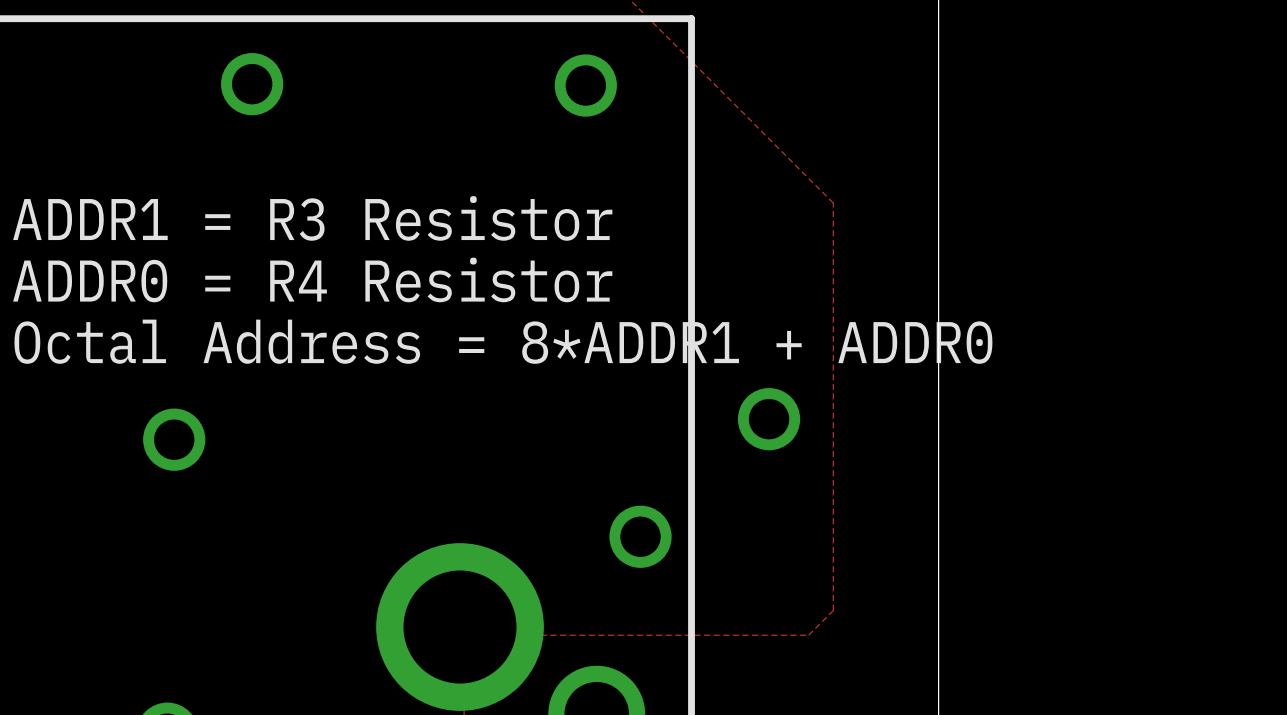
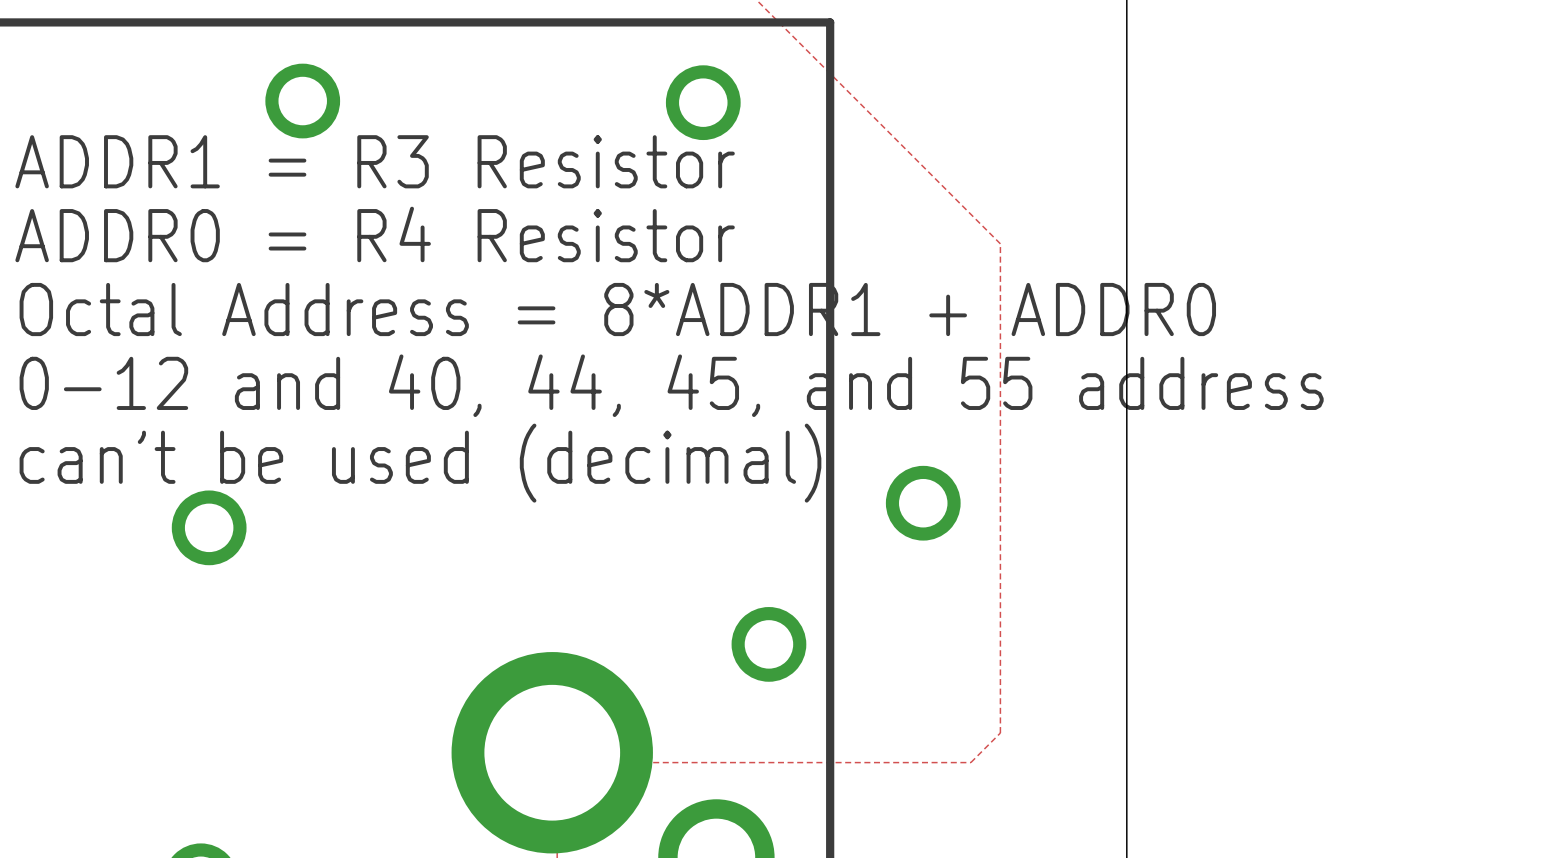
text position: ADDR1 = R3 Resistor (312, 218) -> ADDR1 = R3 Resistor (375, 161)
text position: ADDR0 = R4 Resistor (312, 279) -> ADDR0 = R4 Resistor (375, 234)
text: none -> 0-12 and 40, 44, 45, and 55 address (671, 385)
text position: Octal Address = 8*ADDR1 + ADDR0 (503, 341) -> Octal Address = 8*ADDR1 + ADDR0 (617, 309)
text: none -> can’t be used (decimal) (420, 463)

